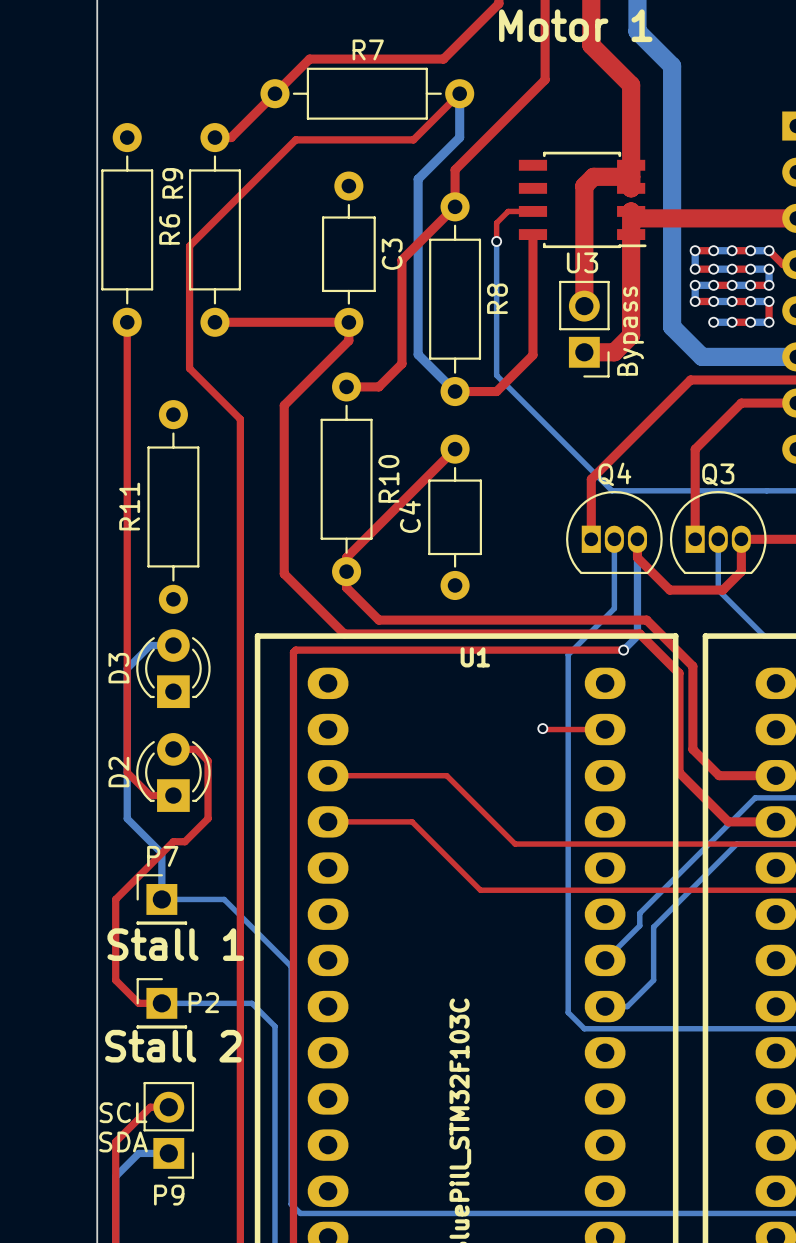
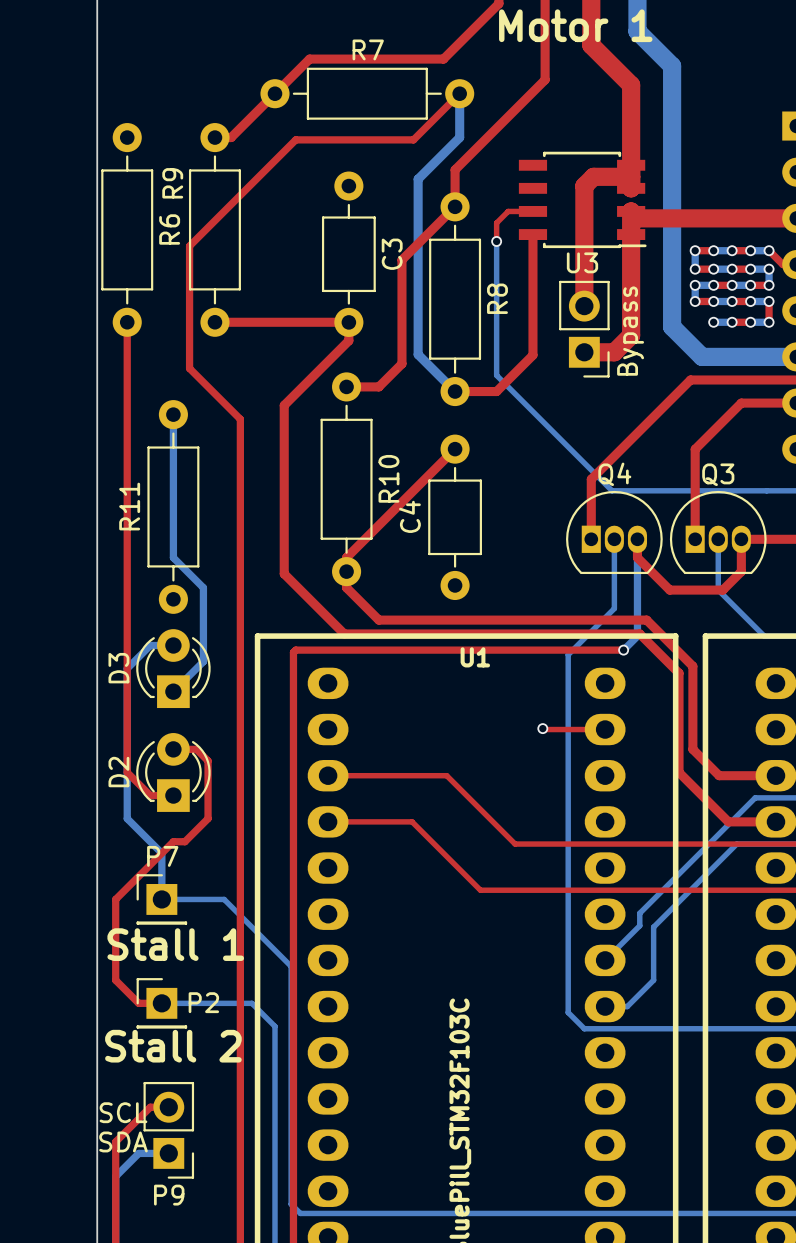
bottom track: none -> (173, 414) (173, 557) (203, 587) (203, 661) (173, 691)

